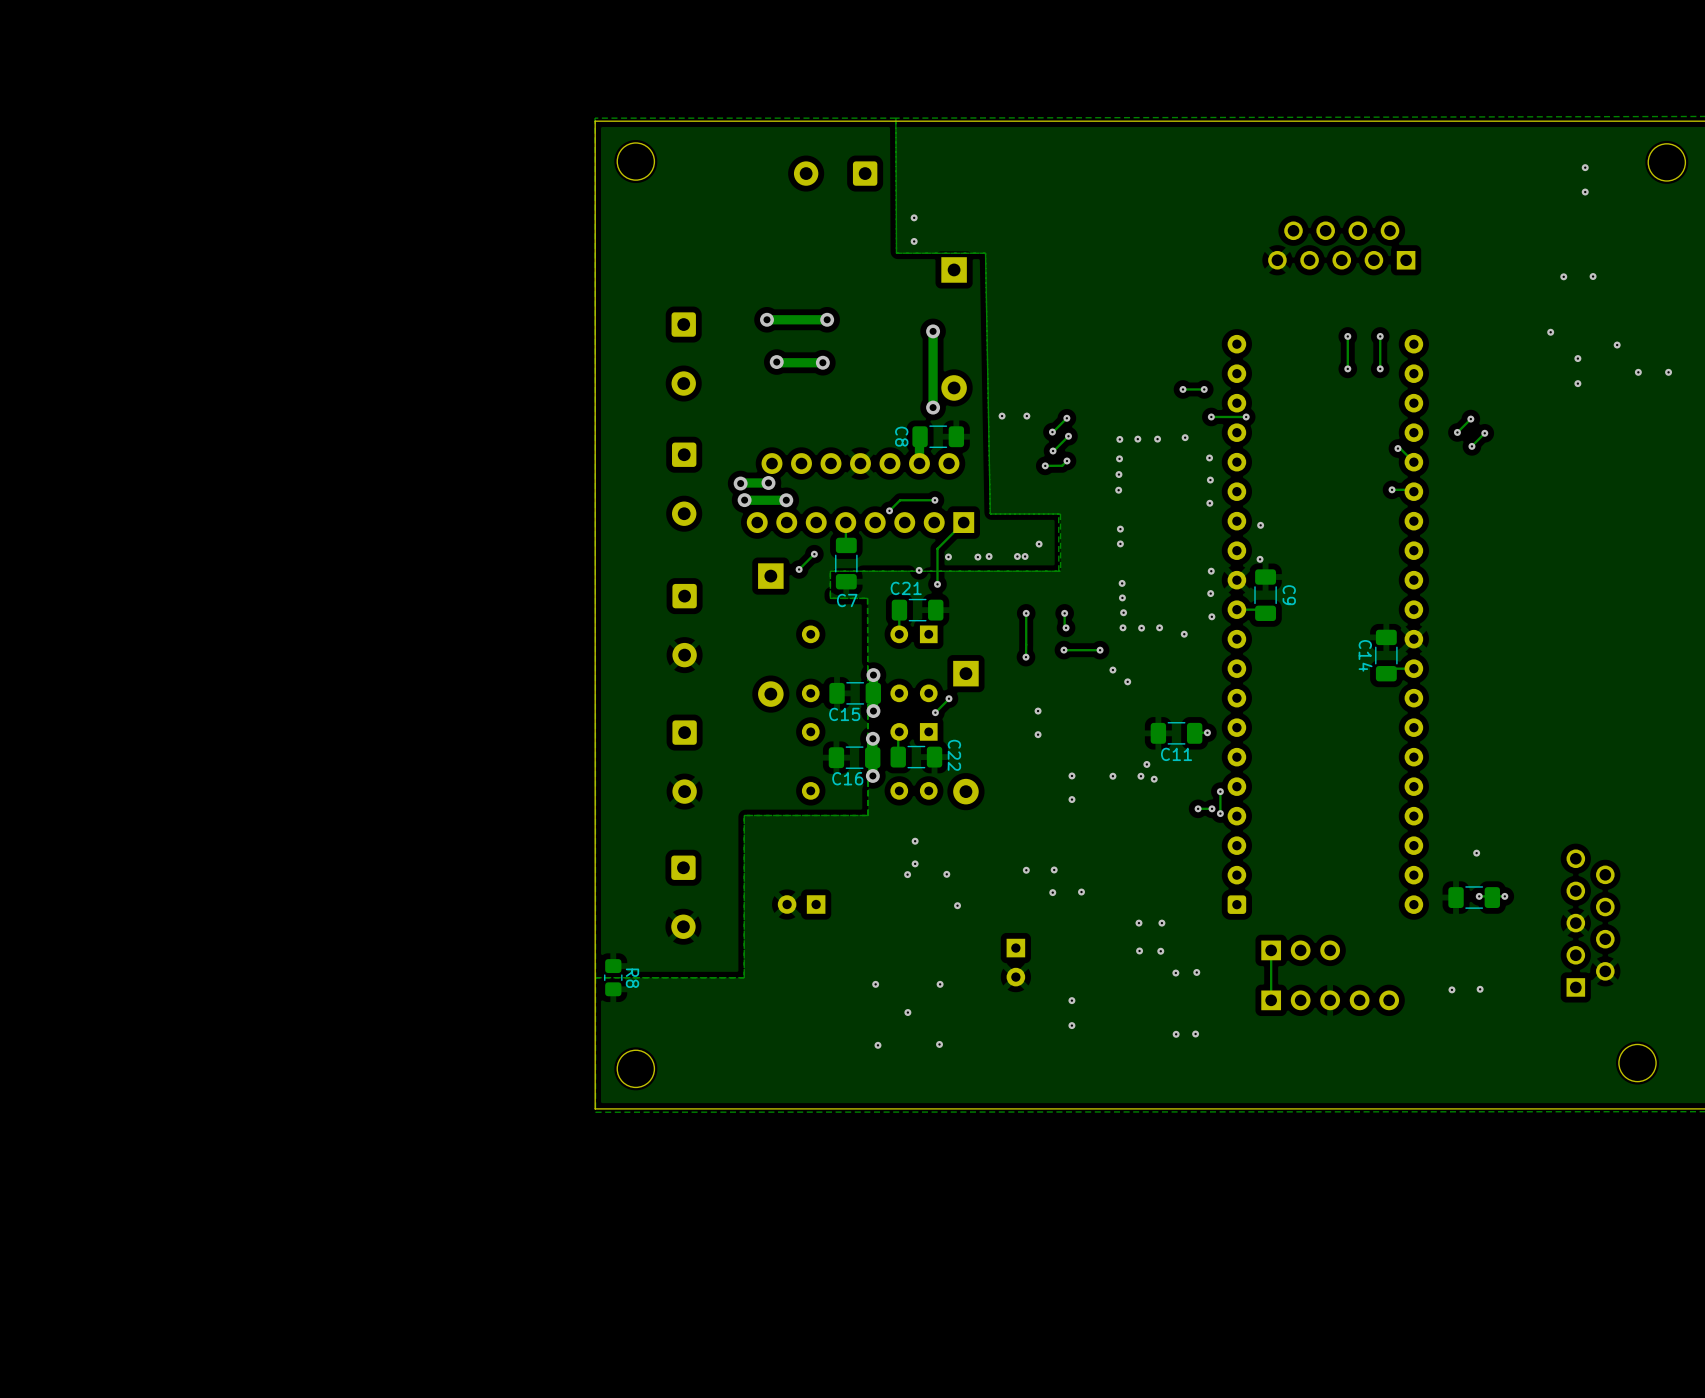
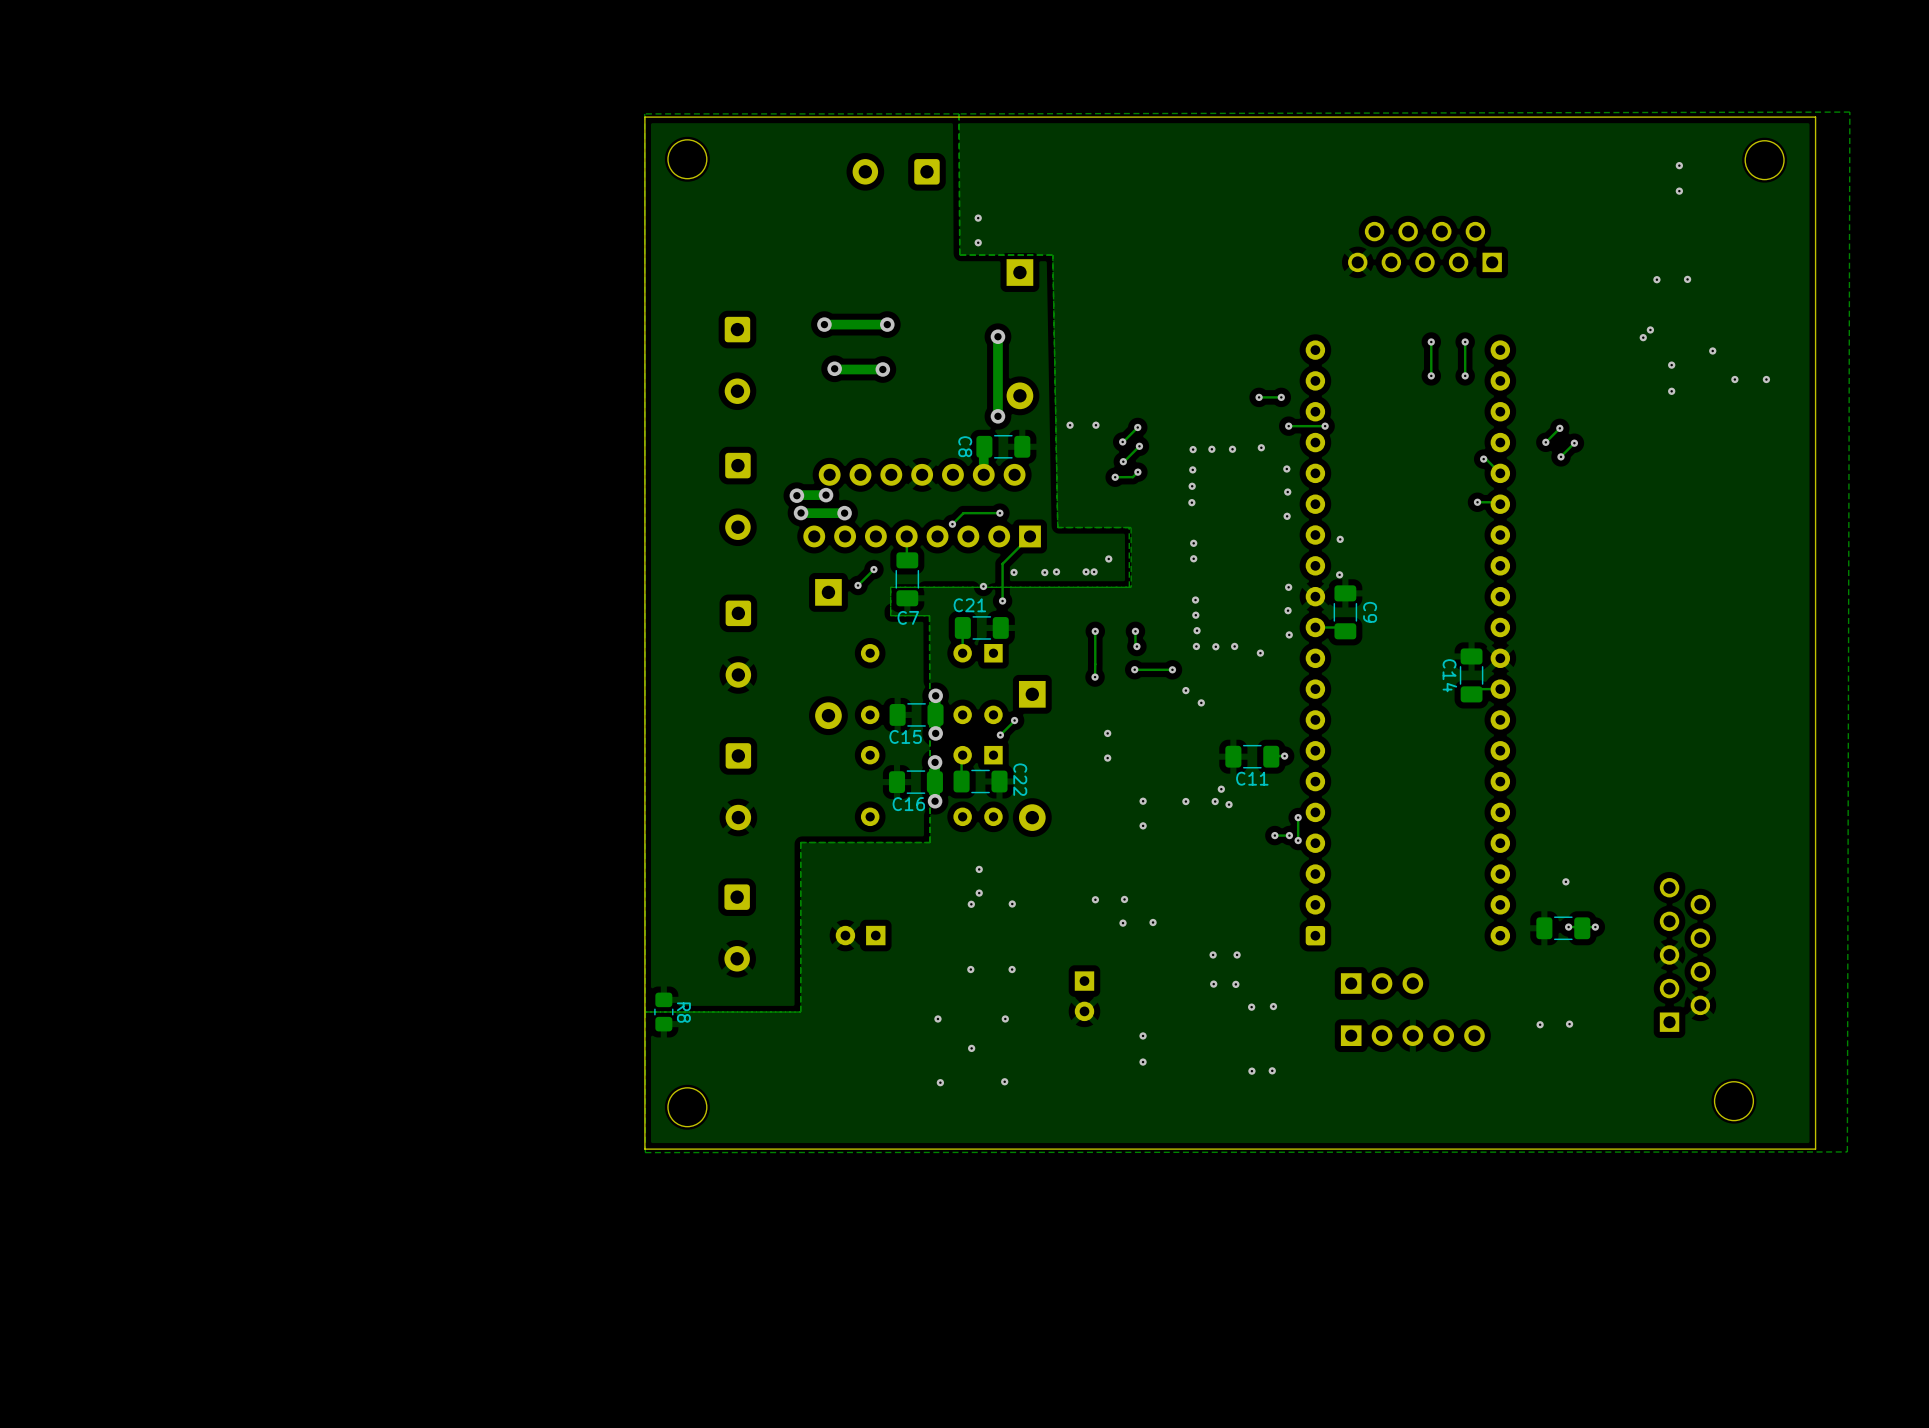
via: none -> (1650, 329)
via: (957, 905) -> none
via: none -> (970, 969)
via: none -> (1012, 969)
track: (1271, 950) (1271, 1000) -> none

